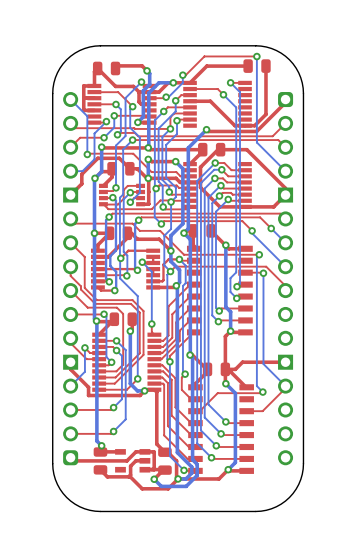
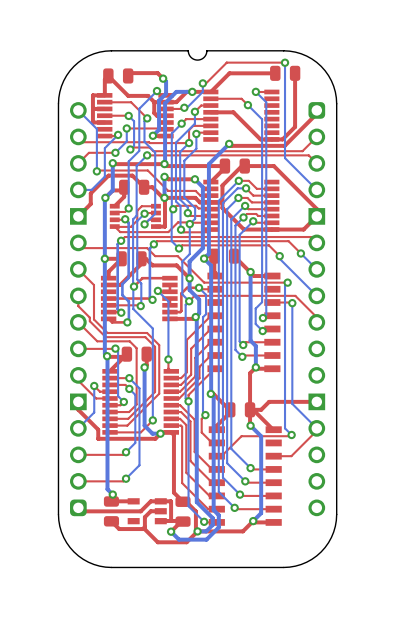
part footprint: [52, 45, 304, 512] -> [57, 50, 338, 568]

